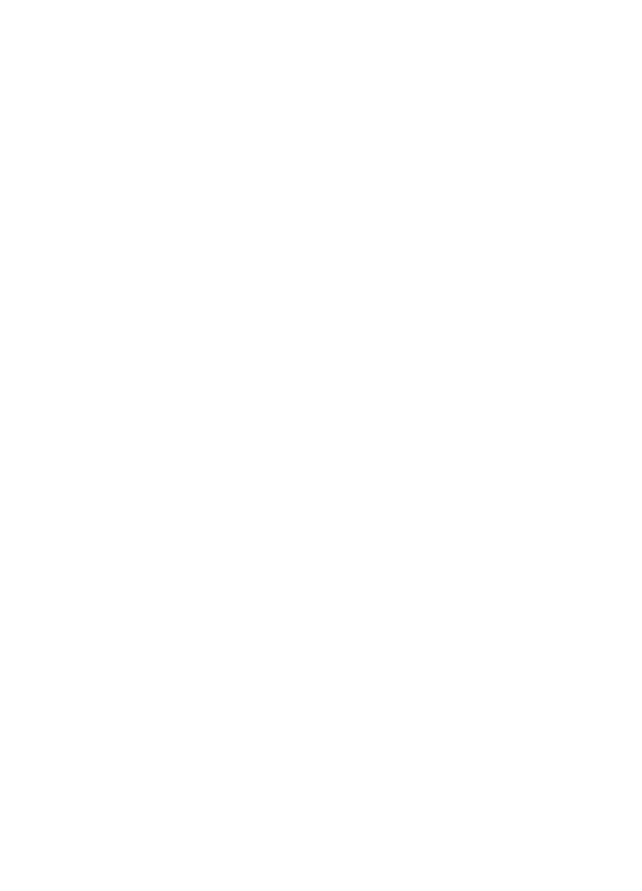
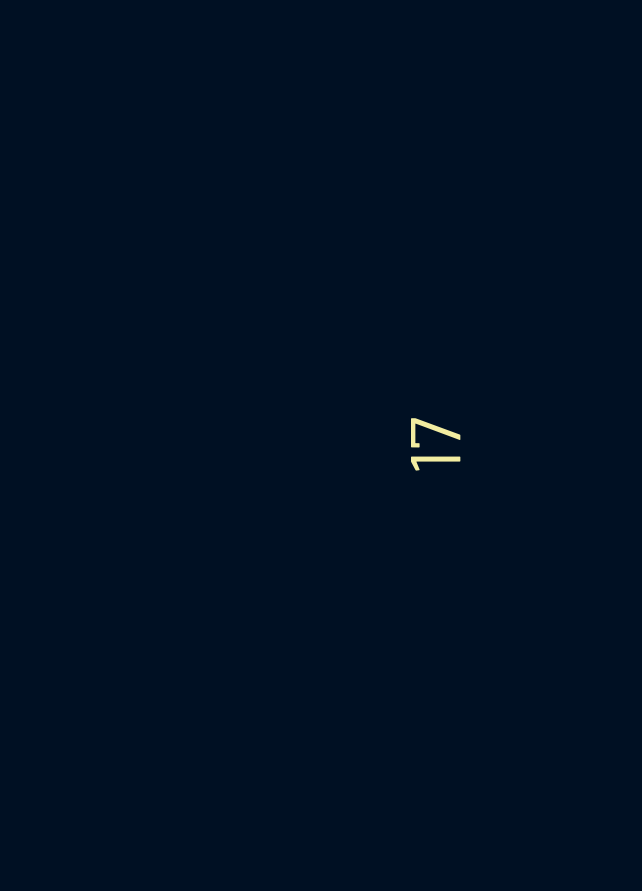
text: none -> 17 (435, 444)

